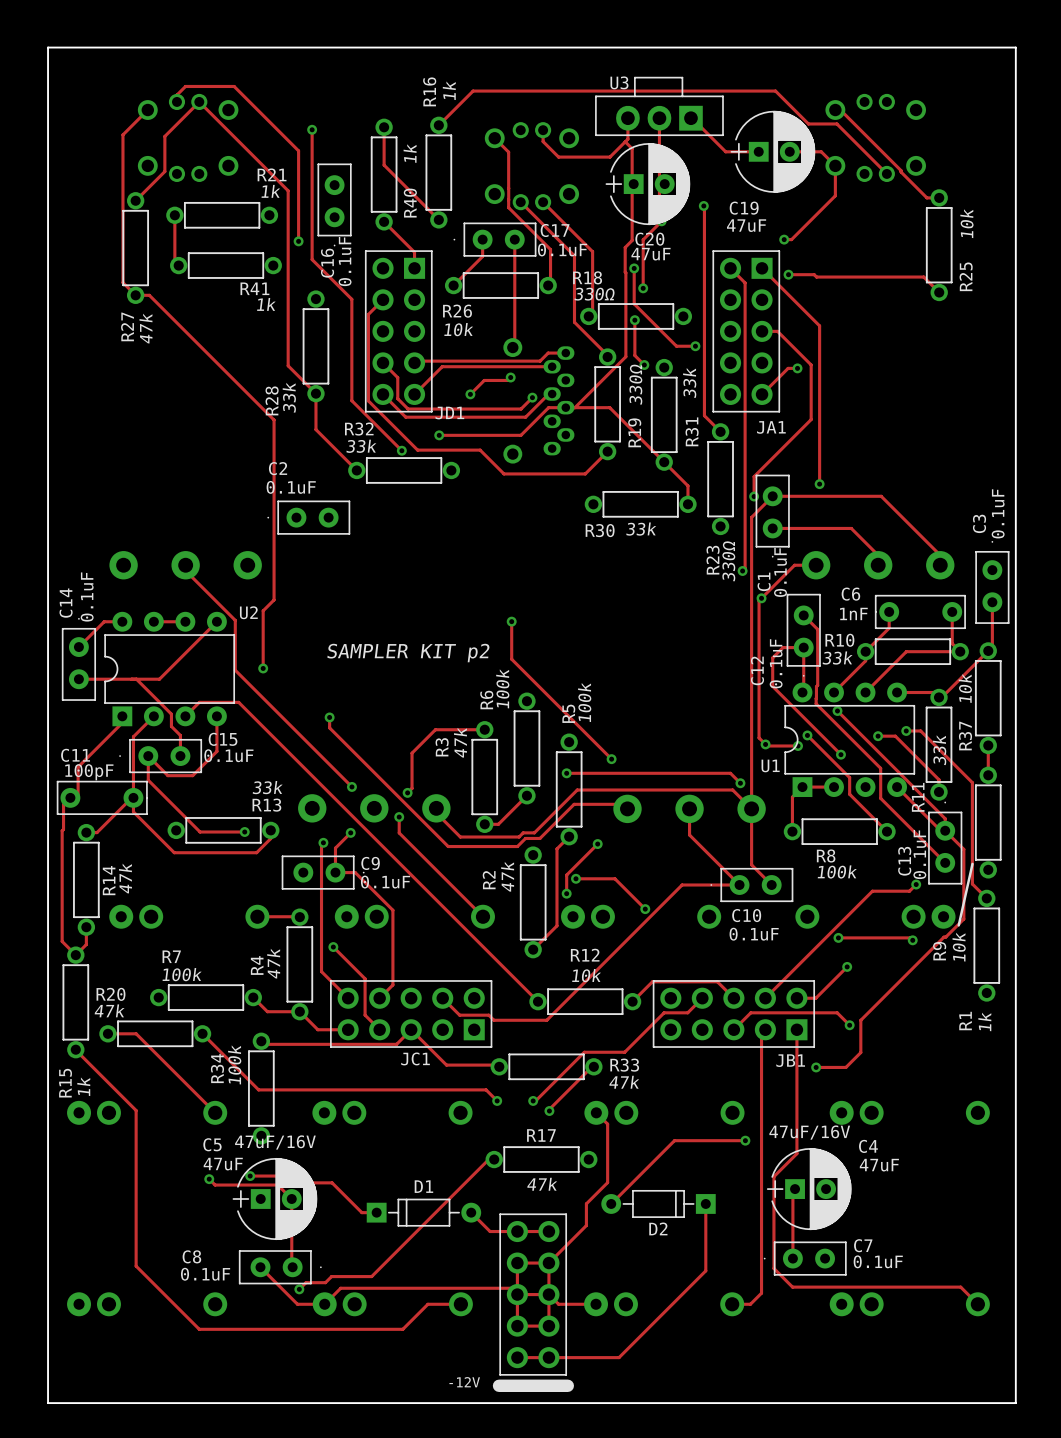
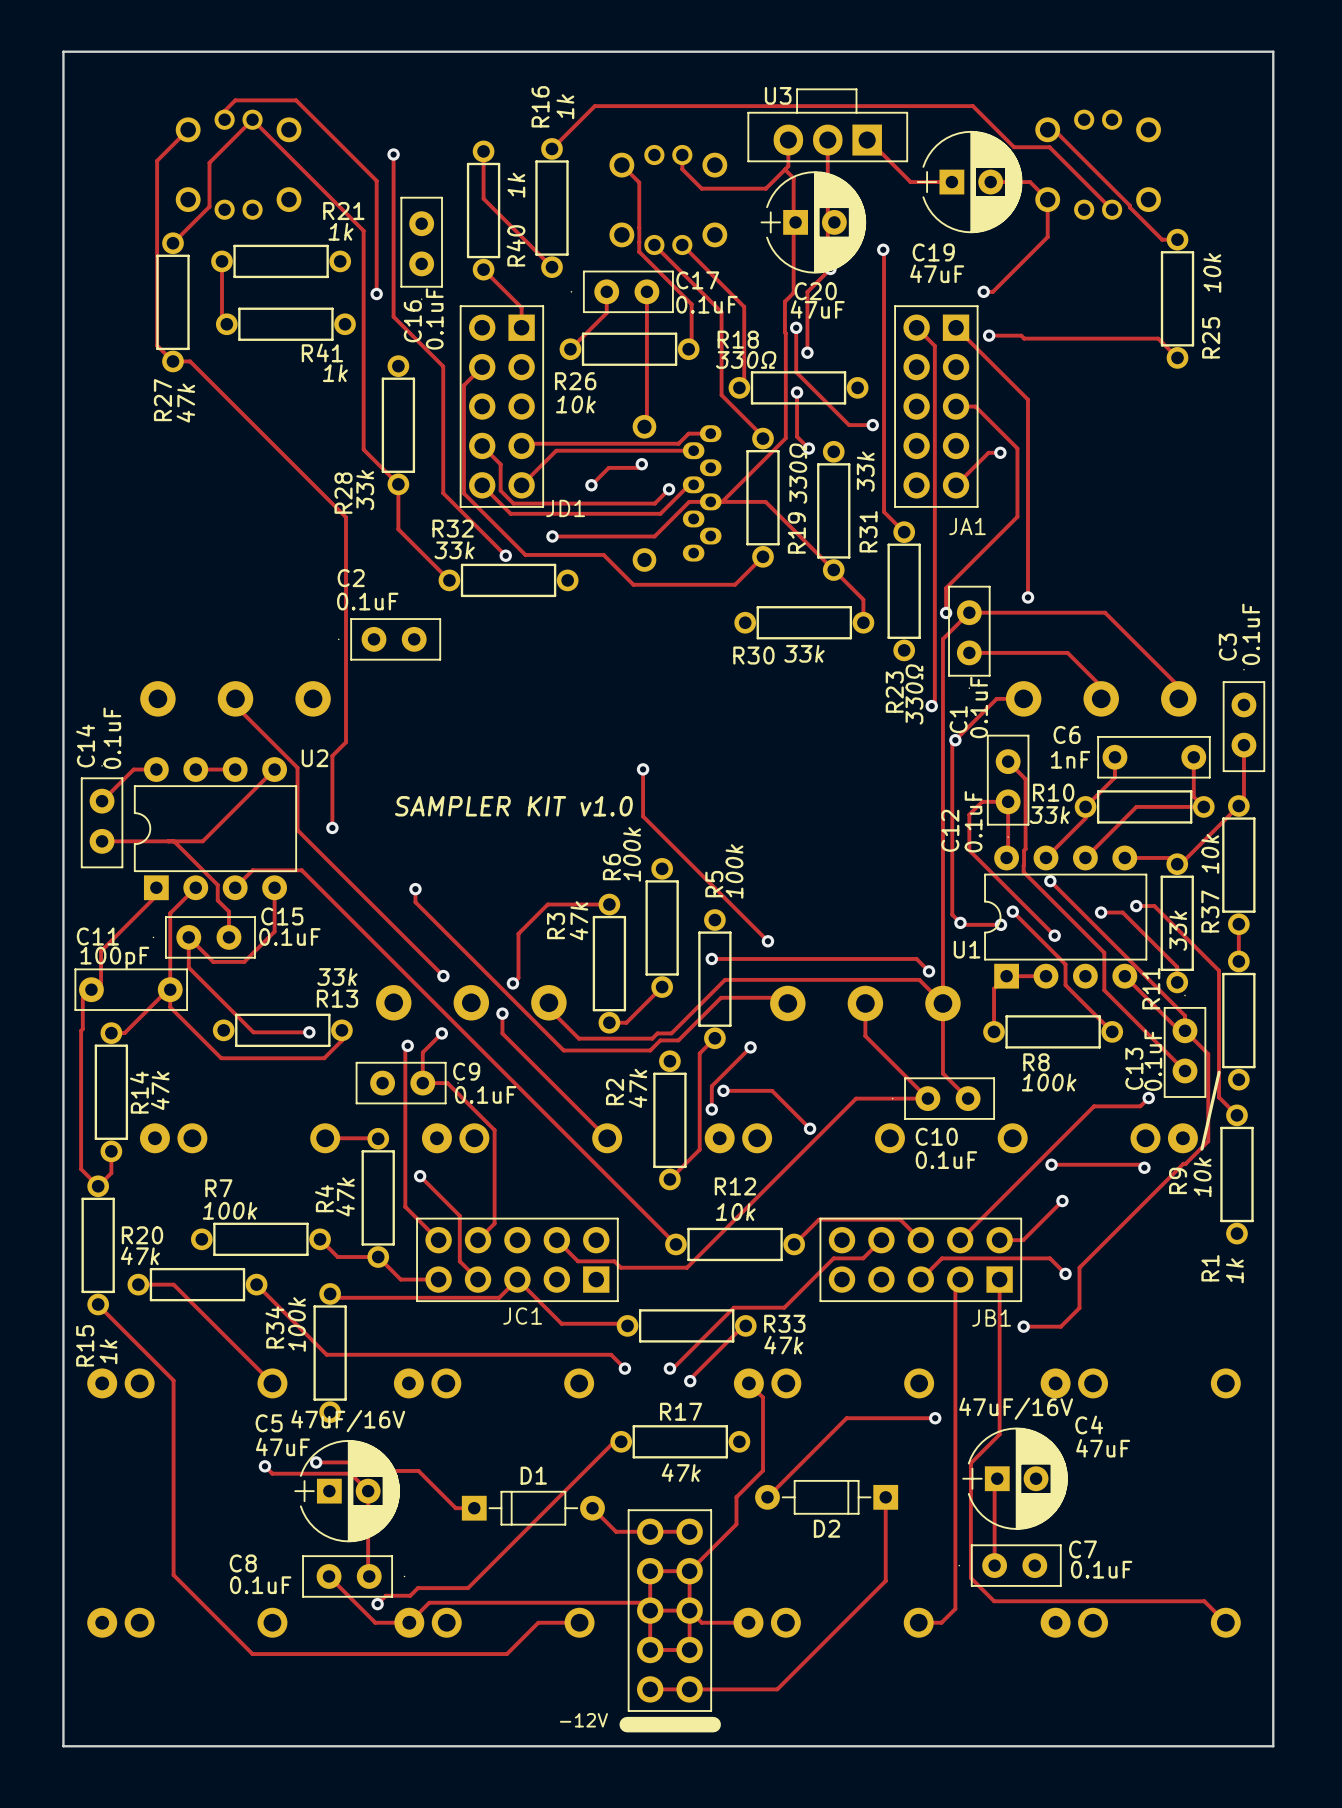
text: SAMPLER KIT p2 (408, 653) -> SAMPLER KIT v1.0 (513, 806)

